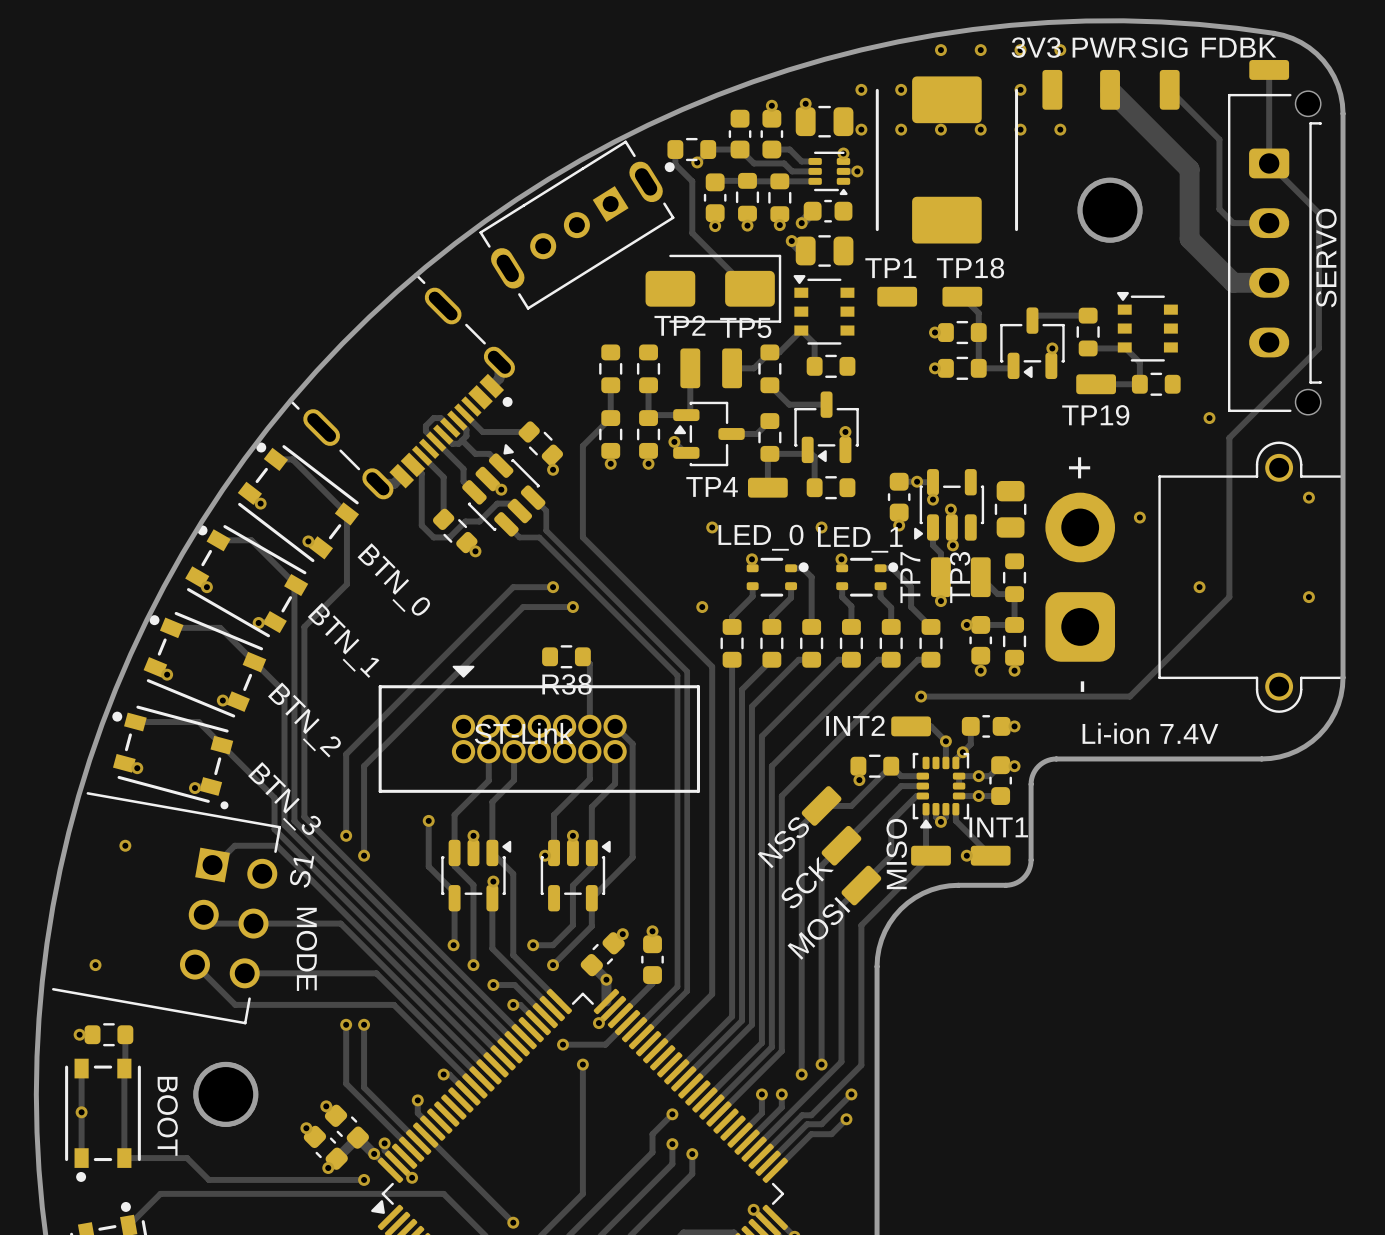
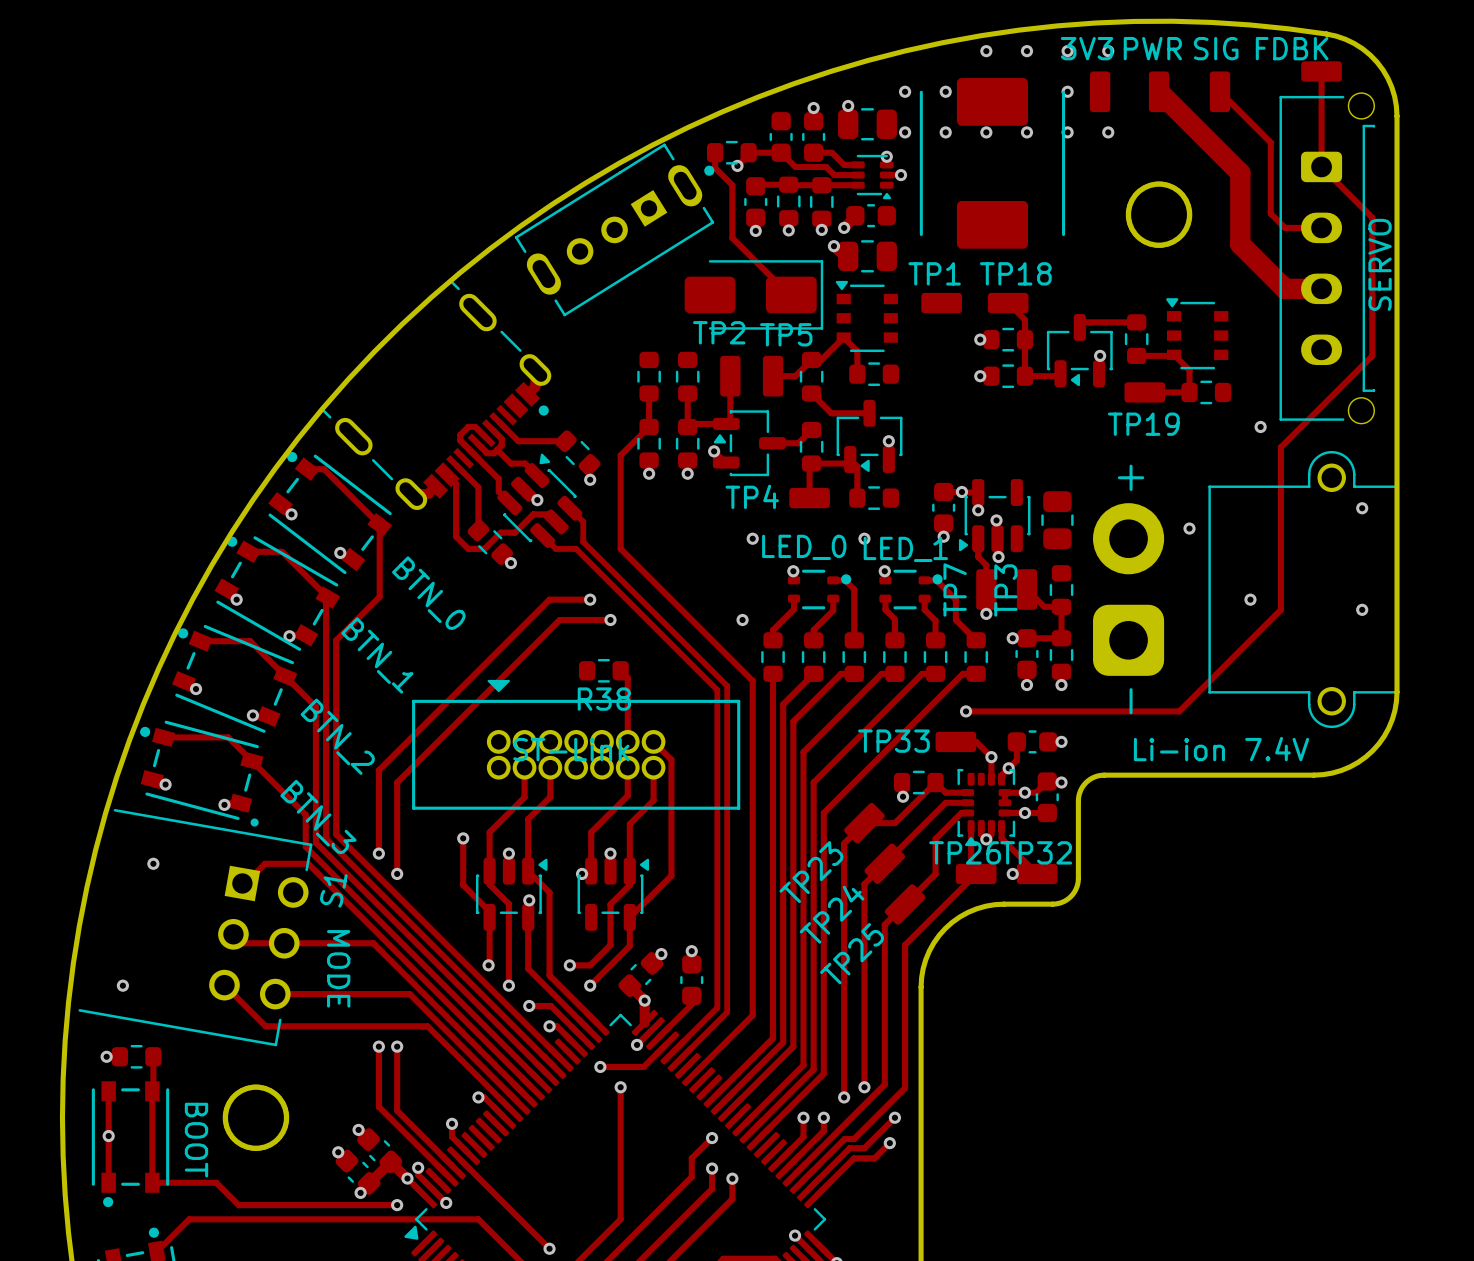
TP33 name: none -> TP33 (893, 741)
text: INT2 (855, 725) -> none
text: INT1 (998, 827) -> none
TP26 name: none -> TP26 (965, 852)
TP32 name: none -> TP32 (1036, 852)
text: NSS (783, 842) -> none
TP23 name: none -> TP23 (811, 872)
text: MISO (896, 854) -> none
text: SCK (807, 883) -> none
TP24 name: none -> TP24 (832, 914)
text: MOSI (818, 928) -> none
TP25 name: none -> TP25 (852, 953)

